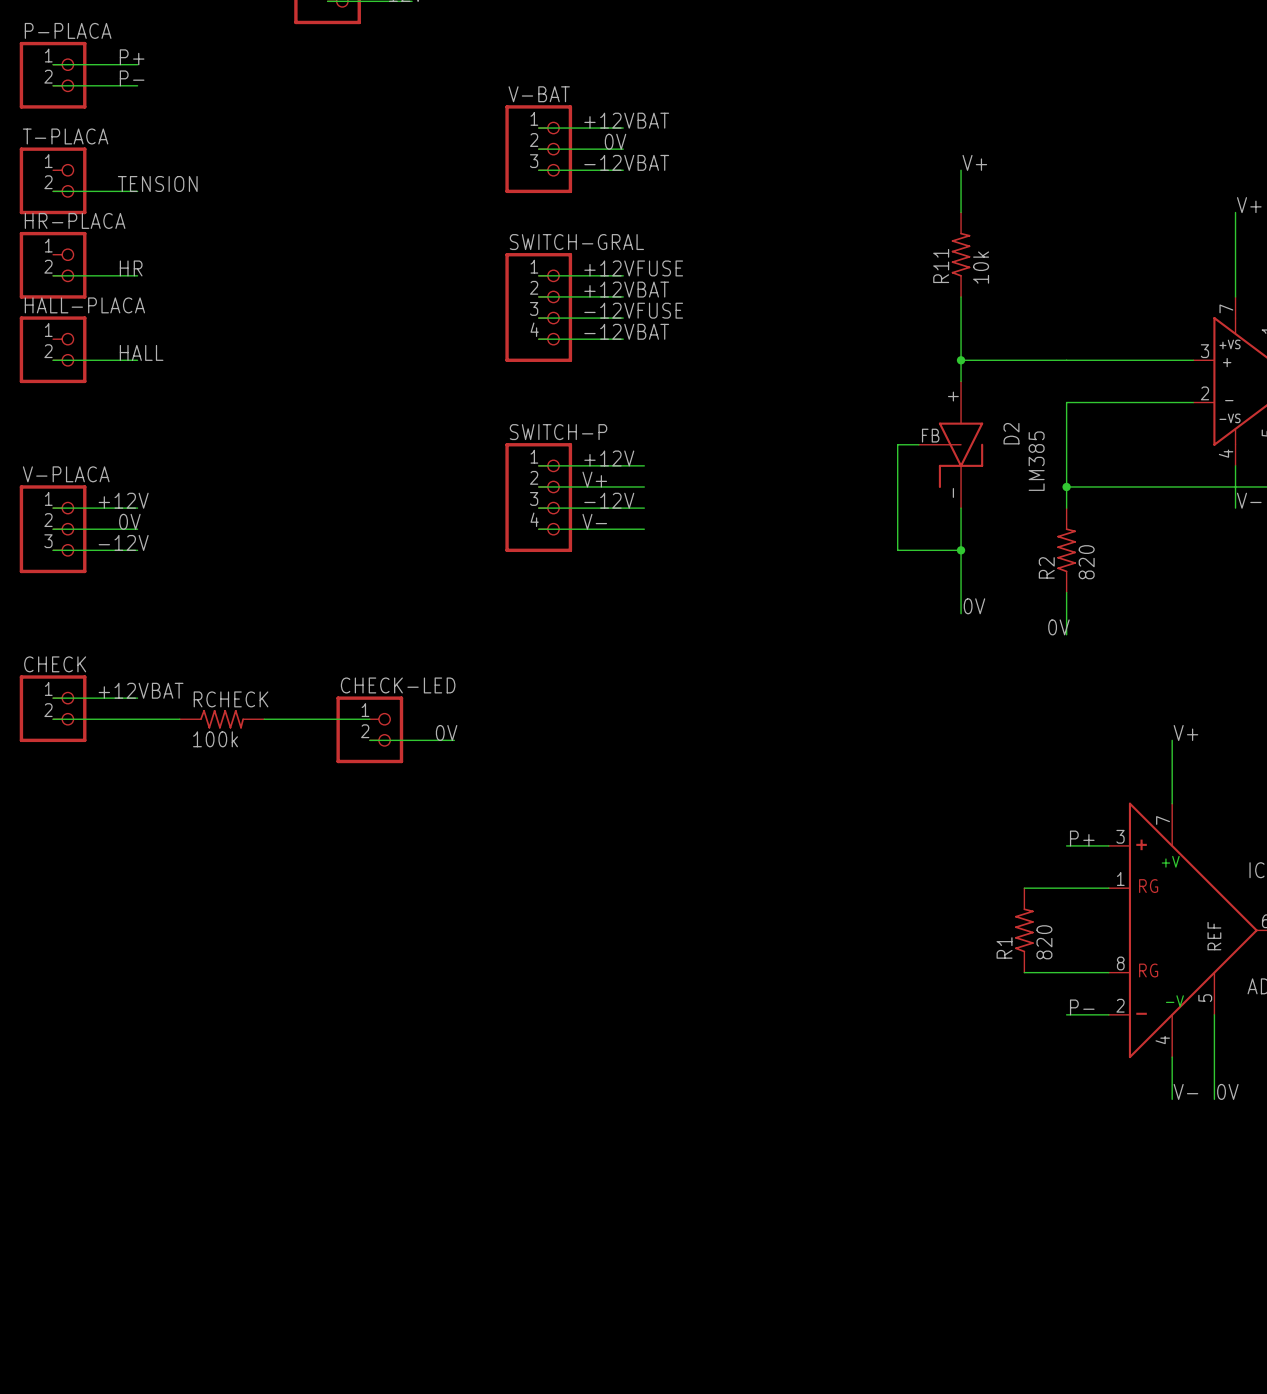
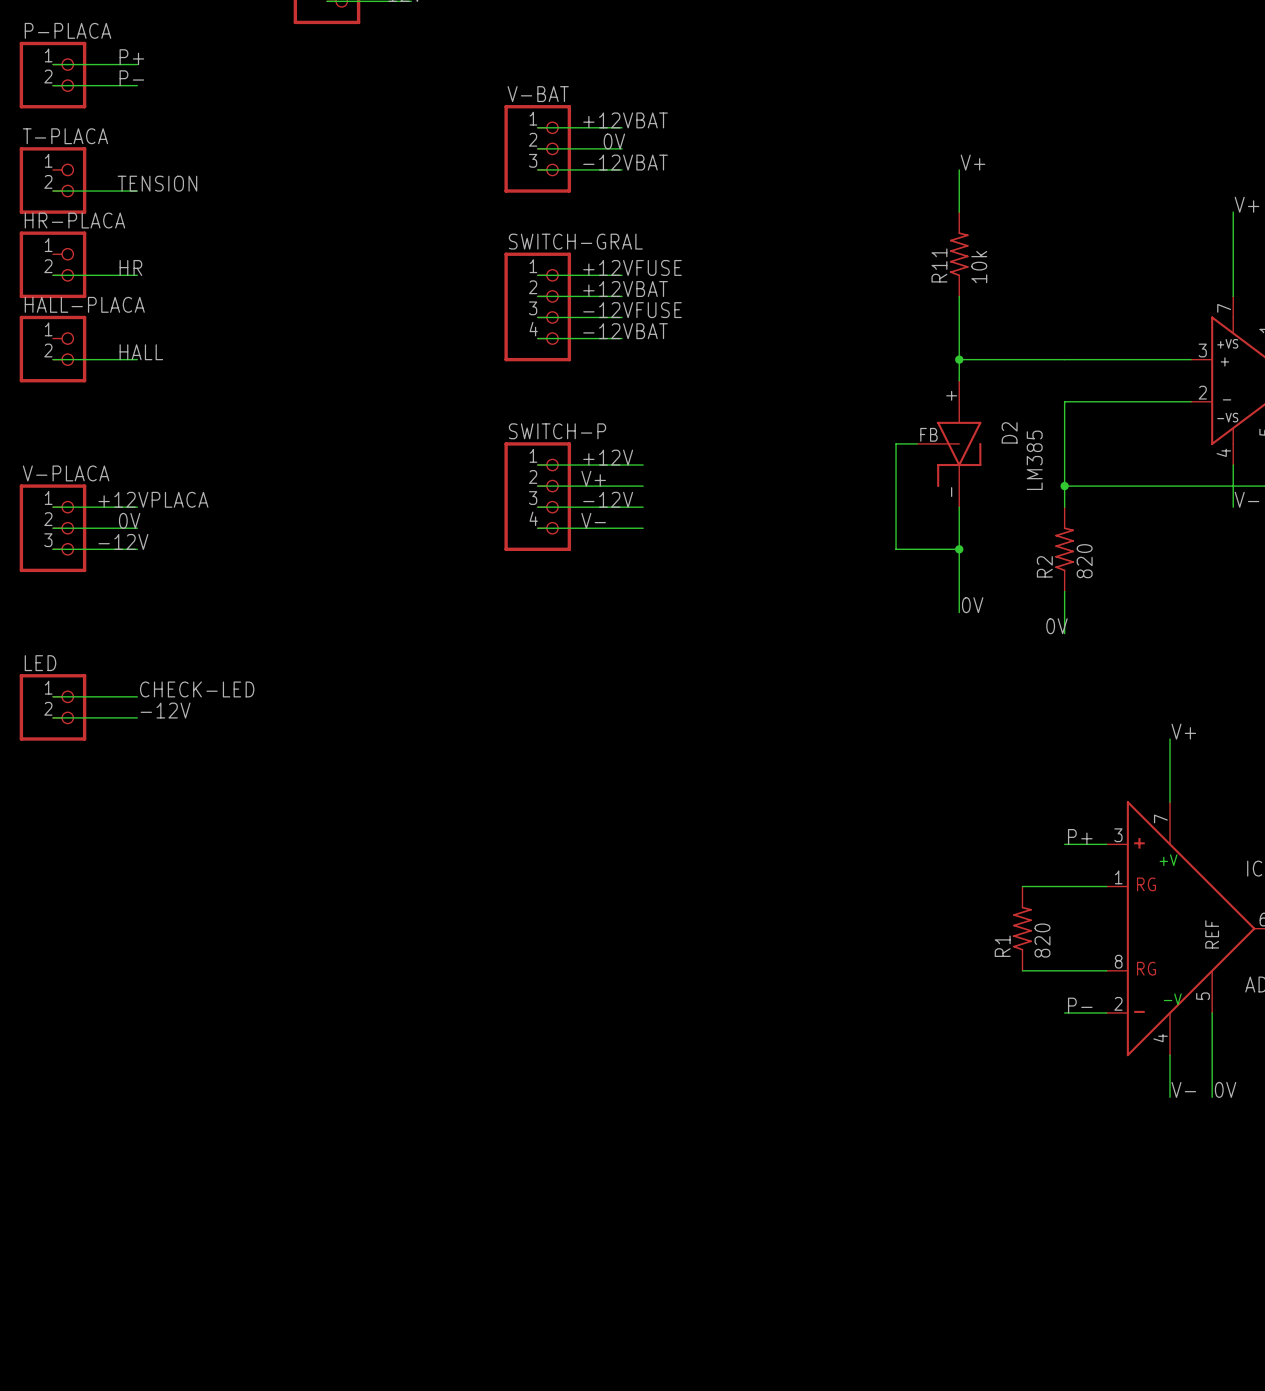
label: +12V (123, 500) -> +12VPLACA (153, 499)
CHECK name: CHECK (55, 664) -> LED (40, 663)
label: +12VBAT (141, 690) -> none
label: none -> CHECK-LED (197, 689)
label: none -> -12V (165, 710)
wire: (137, 719) (179, 719) -> none
RCHECK: 100k (222, 719) -> none
wire: (264, 719) (369, 719) -> none
CHECK-LED: (369, 729) -> none
label: 0V (446, 732) -> none
wire: (369, 740) (454, 740) -> none

